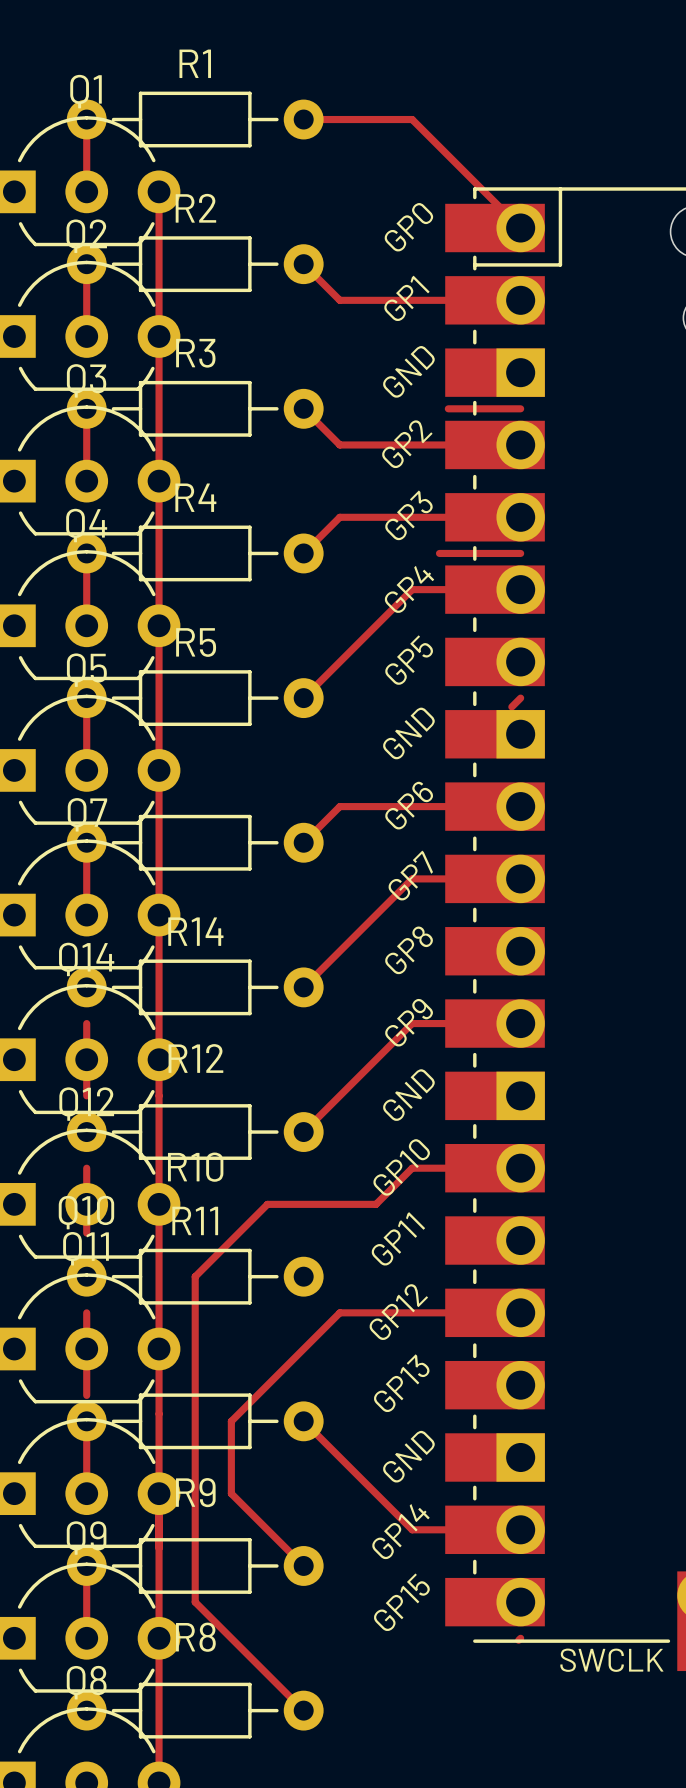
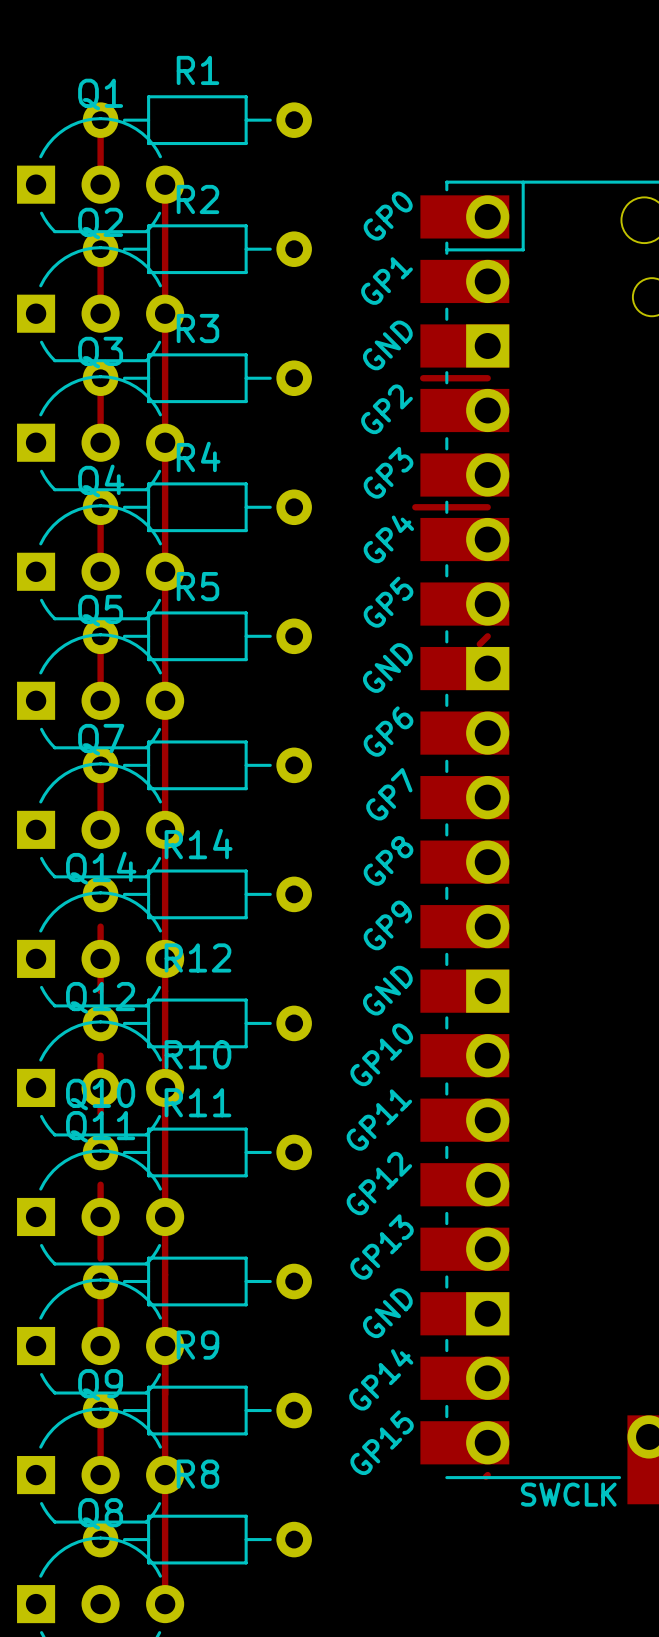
top track: (303, 119) (412, 119) (520, 228) -> none
top track: (303, 264) (339, 300) (520, 300) -> none
top track: (303, 408) (339, 444) (520, 444) -> none
top track: (520, 517) (339, 517) (303, 553) -> none
top track: (520, 589) (412, 589) (303, 698) -> none
top track: (520, 806) (339, 806) (303, 842) -> none
top track: (520, 878) (412, 878) (303, 987) -> none
top track: (520, 1023) (412, 1023) (303, 1132) -> none
top track: (520, 1168) (412, 1168) (376, 1204) (267, 1204) (195, 1276) (195, 1602) (303, 1710) -> none
top track: (520, 1312) (339, 1312) (231, 1421) (231, 1493) (303, 1565) -> none
top track: (303, 1421) (412, 1529) (520, 1529) -> none

